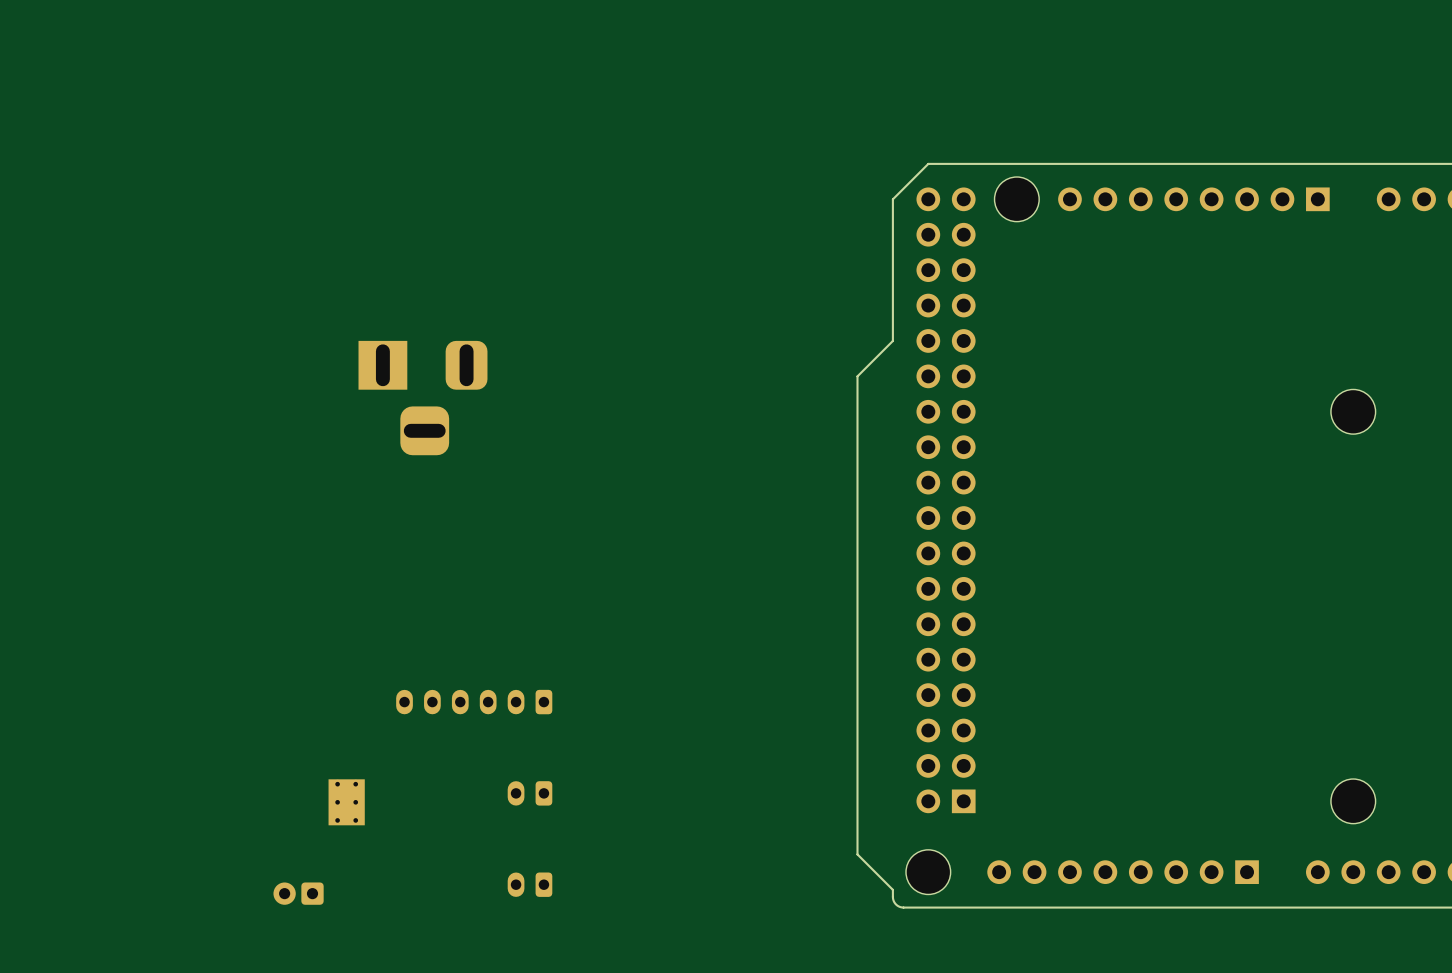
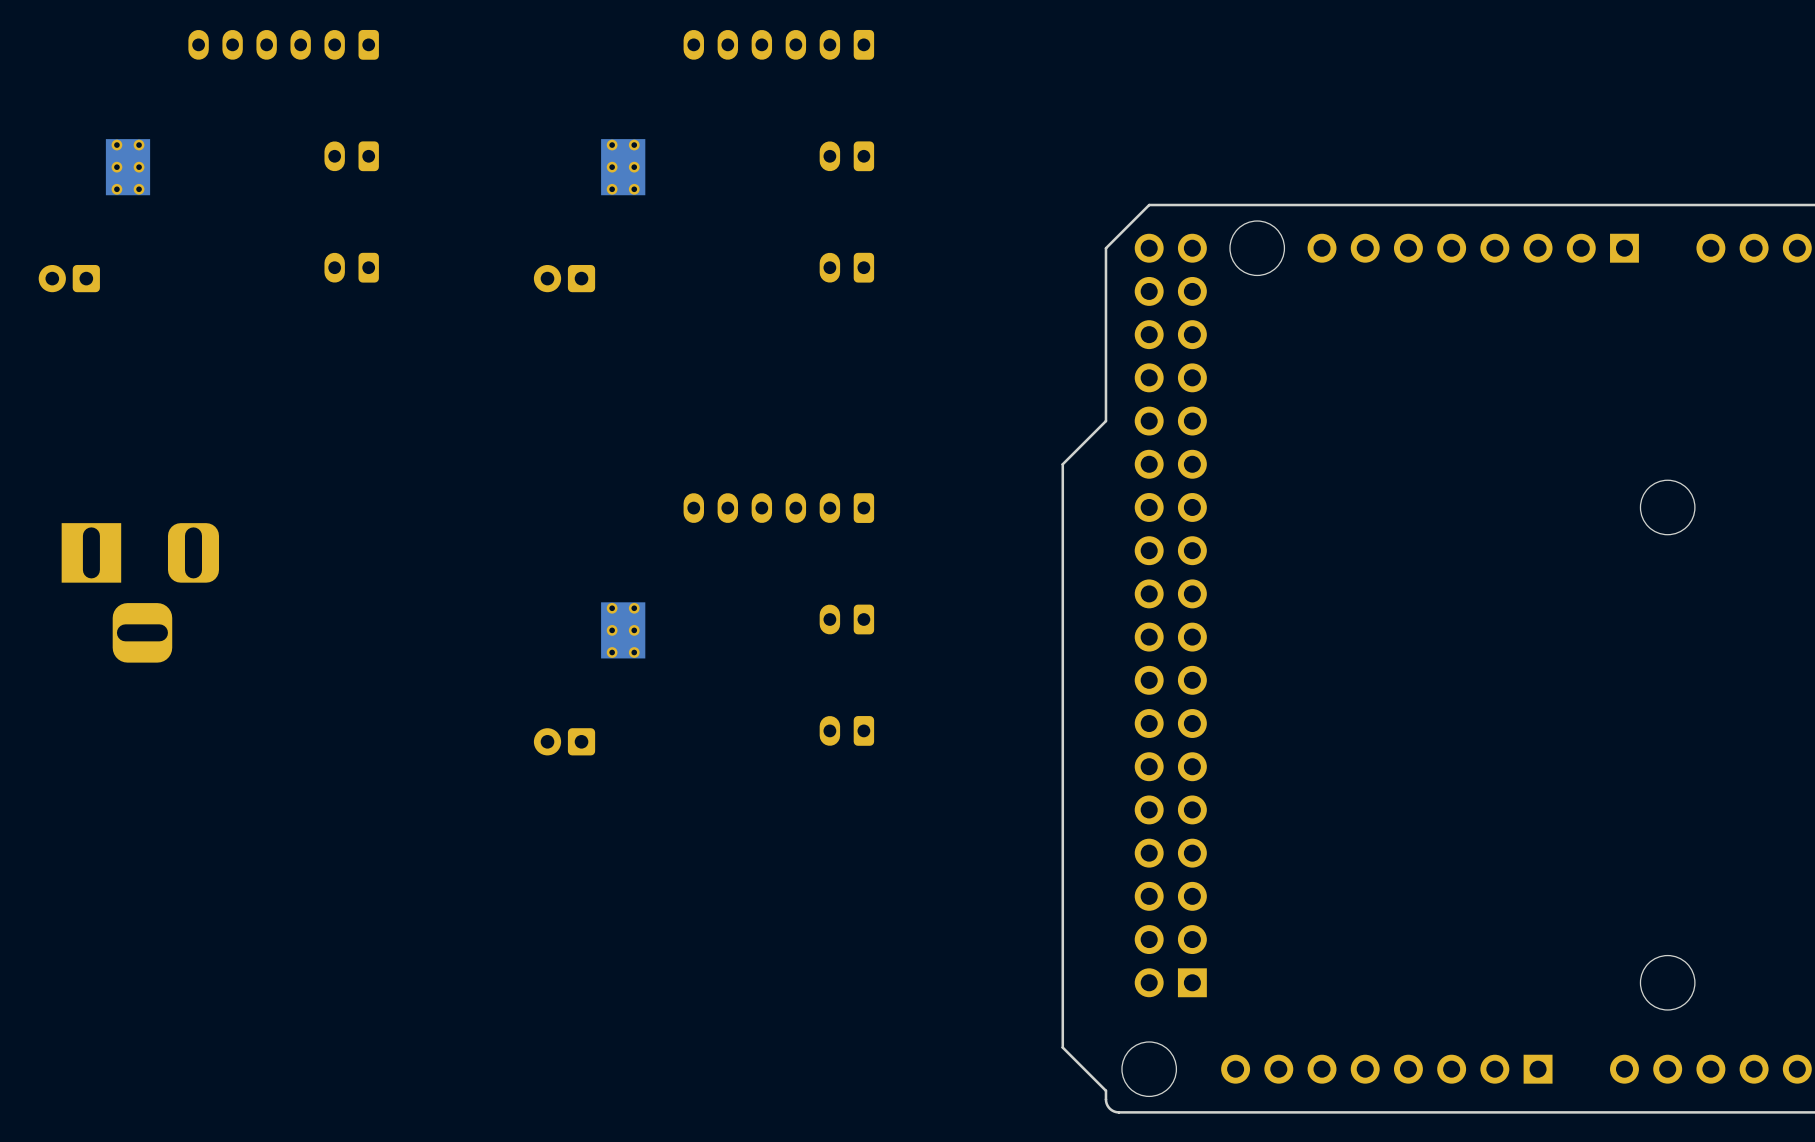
part: none -> (283, 44)
part: none -> (778, 44)
part: none -> (351, 156)
part: none -> (846, 156)
part: none -> (128, 167)
part: none -> (623, 167)
part: none -> (351, 267)
part: none -> (846, 267)
part: none -> (69, 278)
part: none -> (564, 278)
part position: (422, 398) -> (140, 592)
part: none -> (846, 619)
part: none -> (846, 730)
part position: (474, 702) -> (778, 508)
part: (529, 793) -> none
part position: (346, 802) -> (623, 630)
part: (529, 884) -> none
part position: (298, 893) -> (564, 741)

